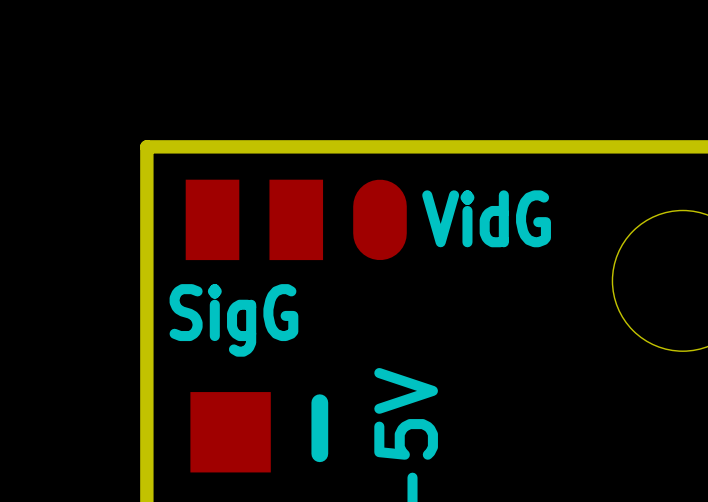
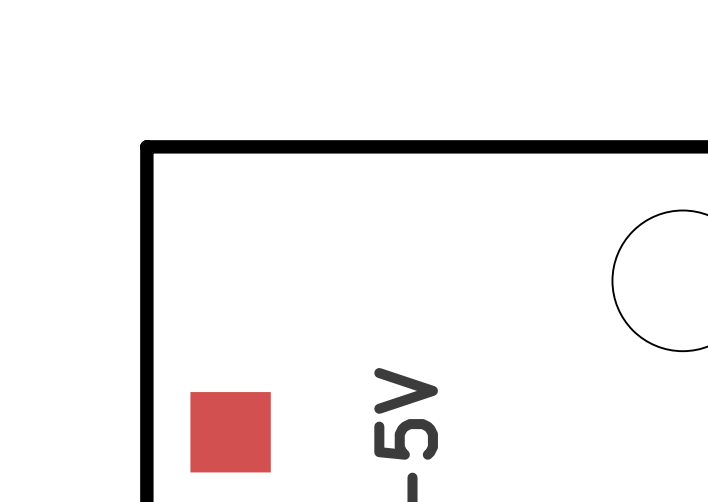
text: VidG (486, 218) -> none
part: (296, 219) -> none
text: SigG (233, 320) -> none
text: - (319, 428) -> none

